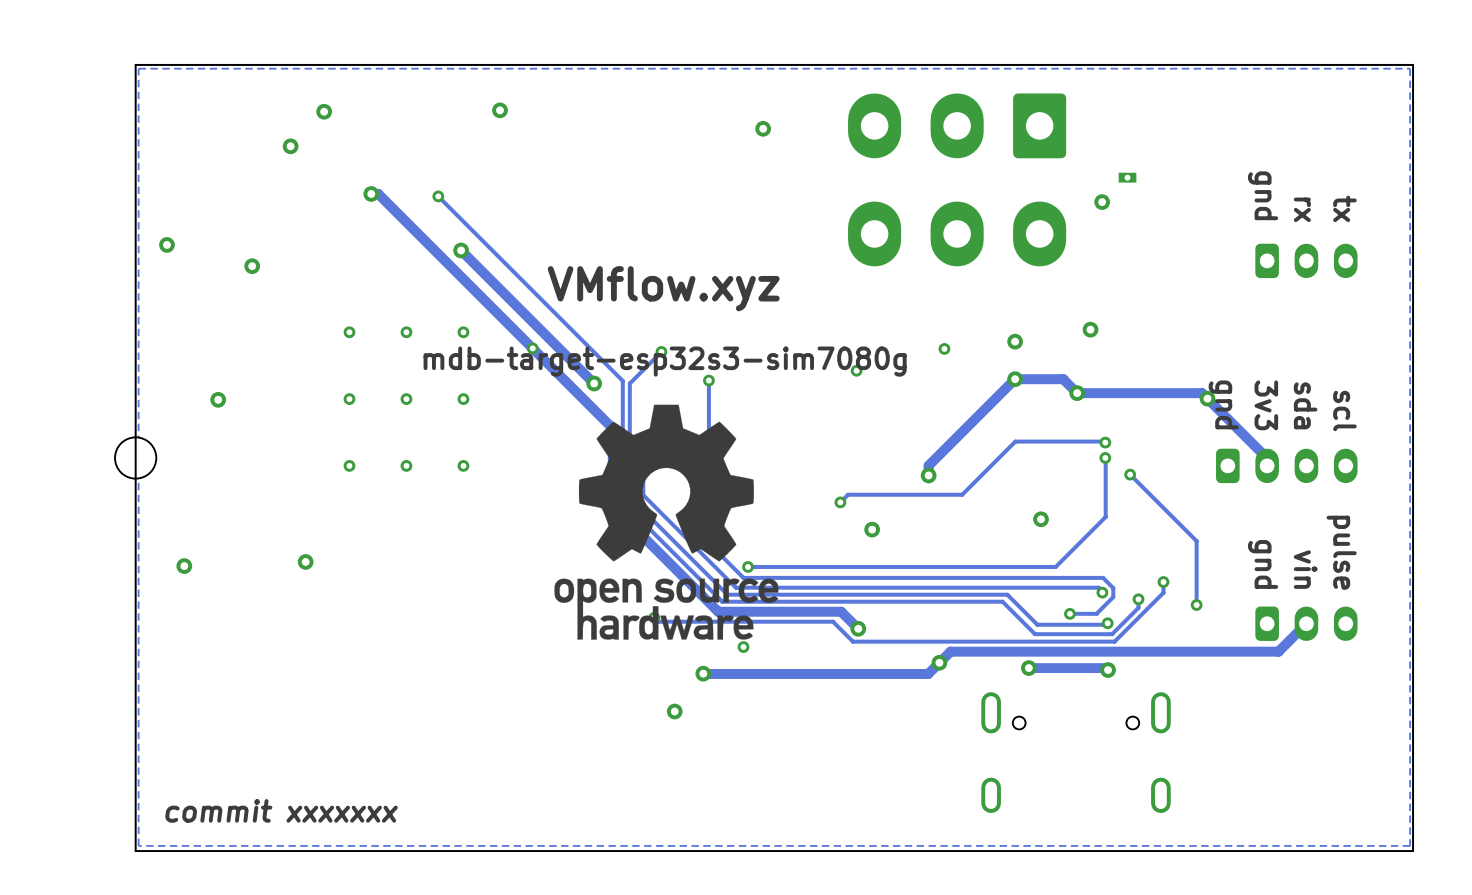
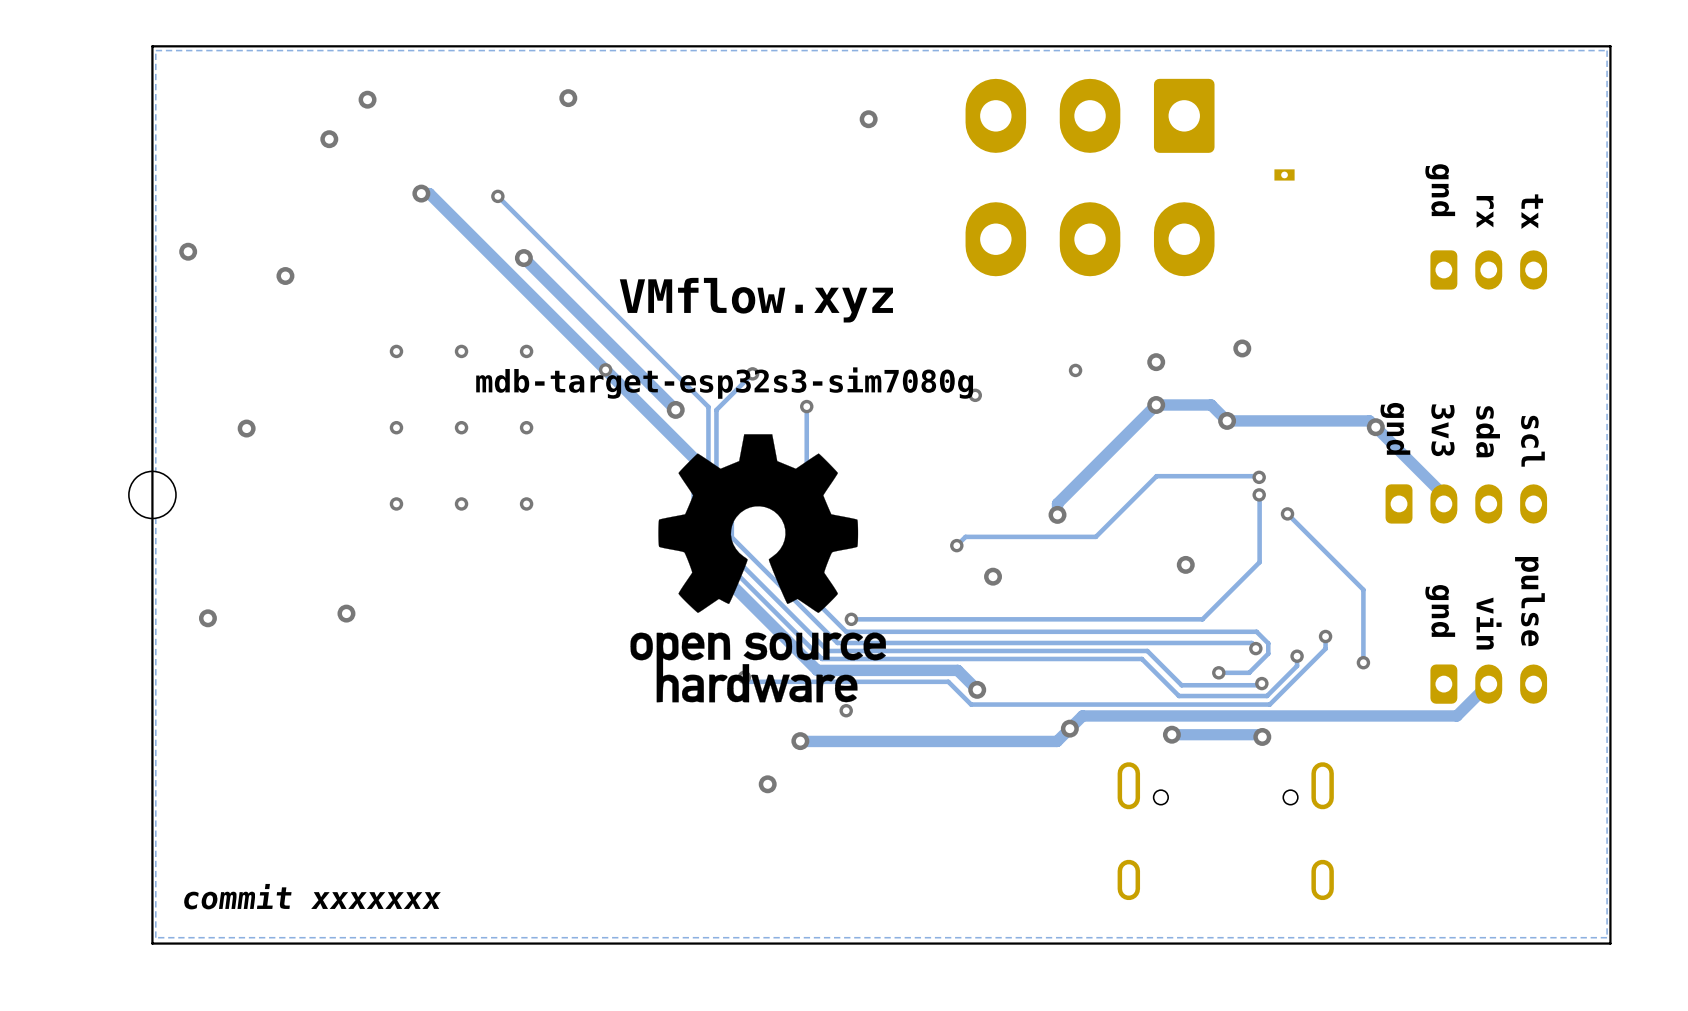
via: (1102, 202) -> none

